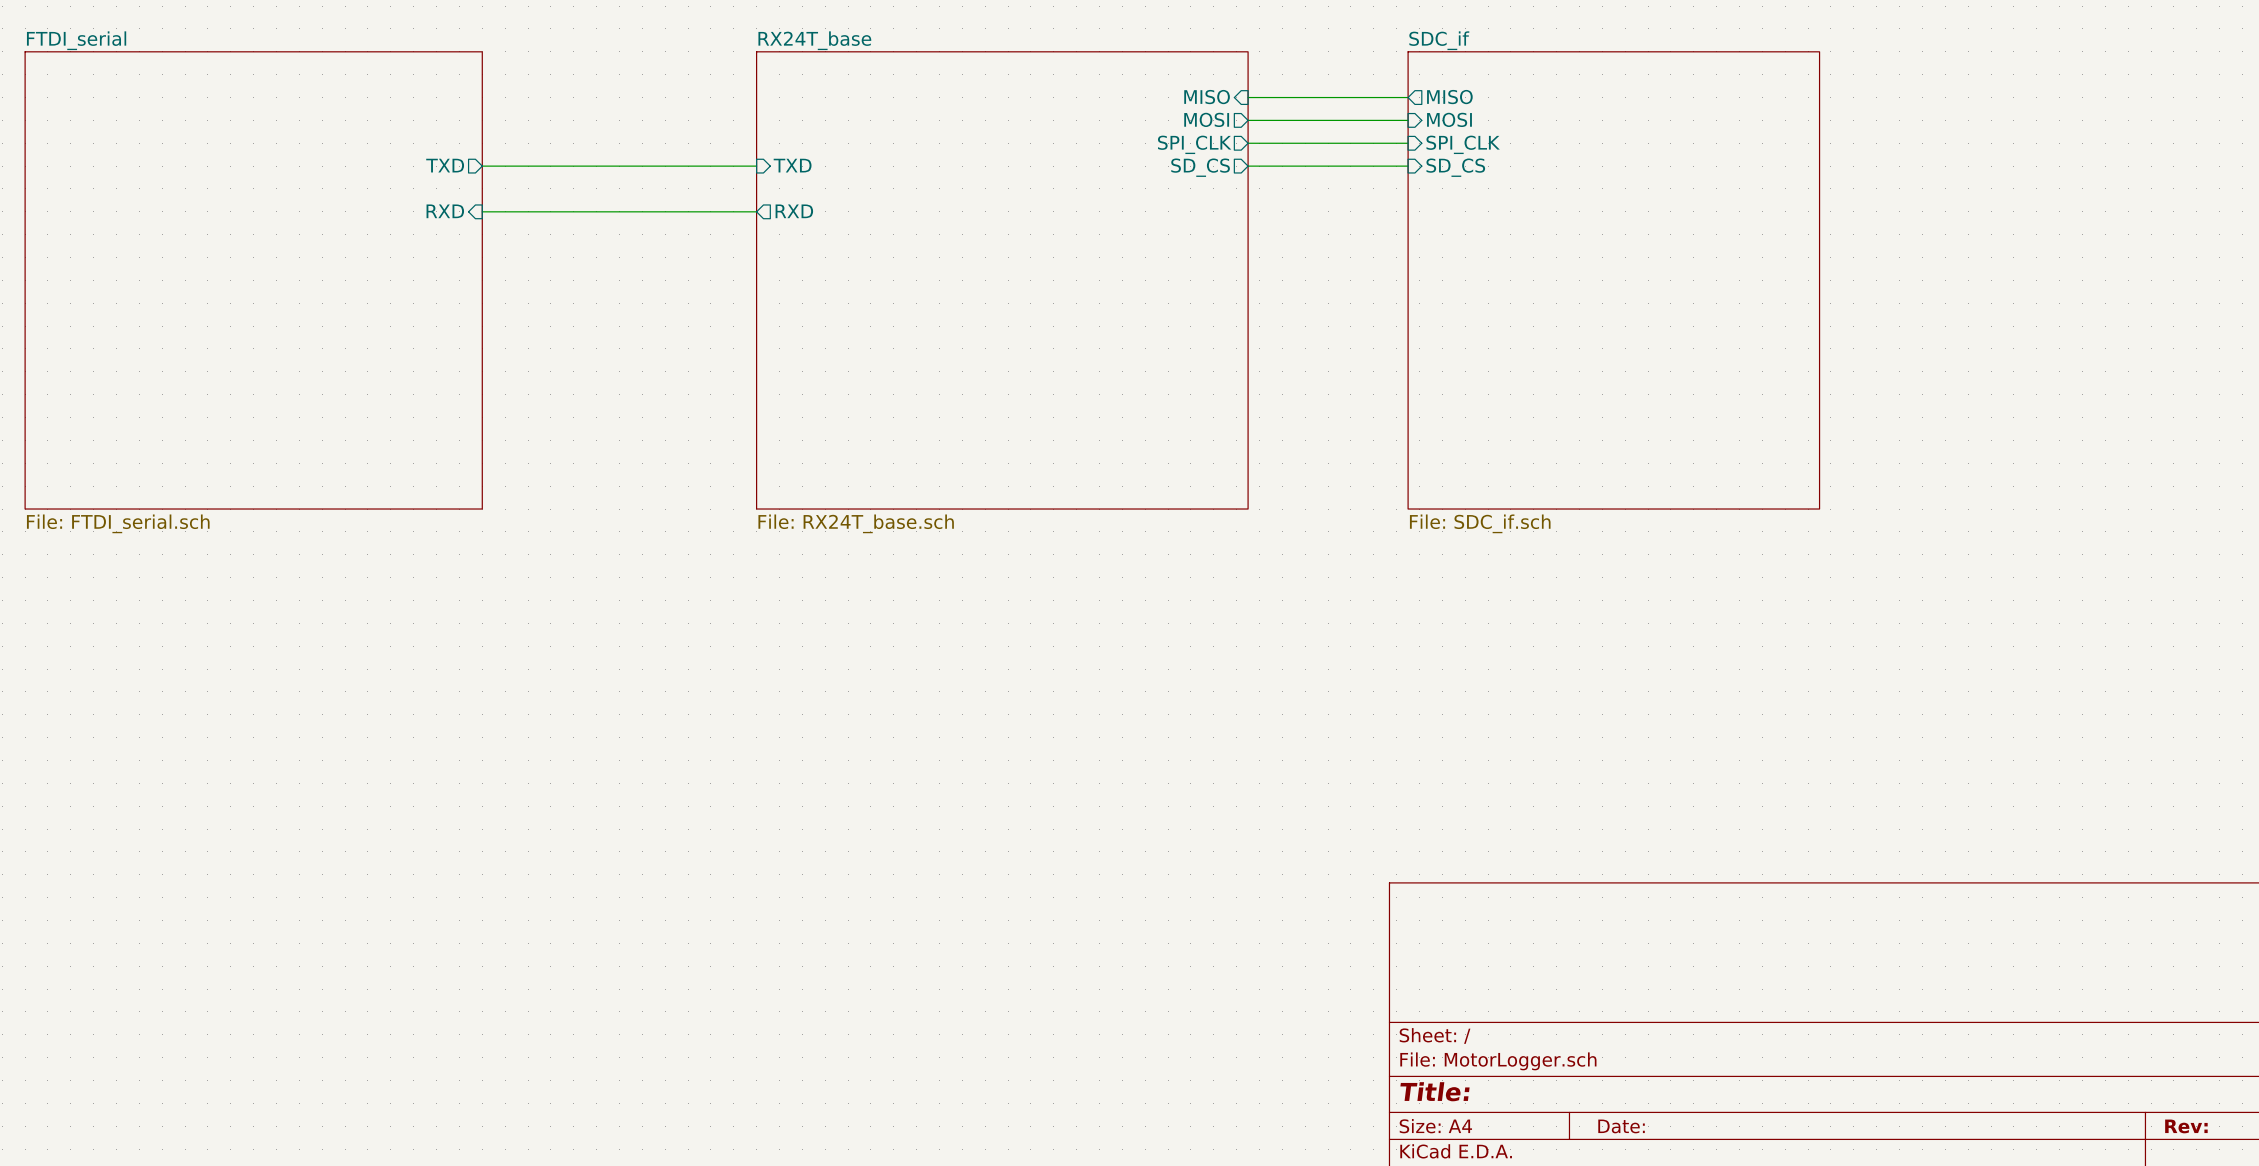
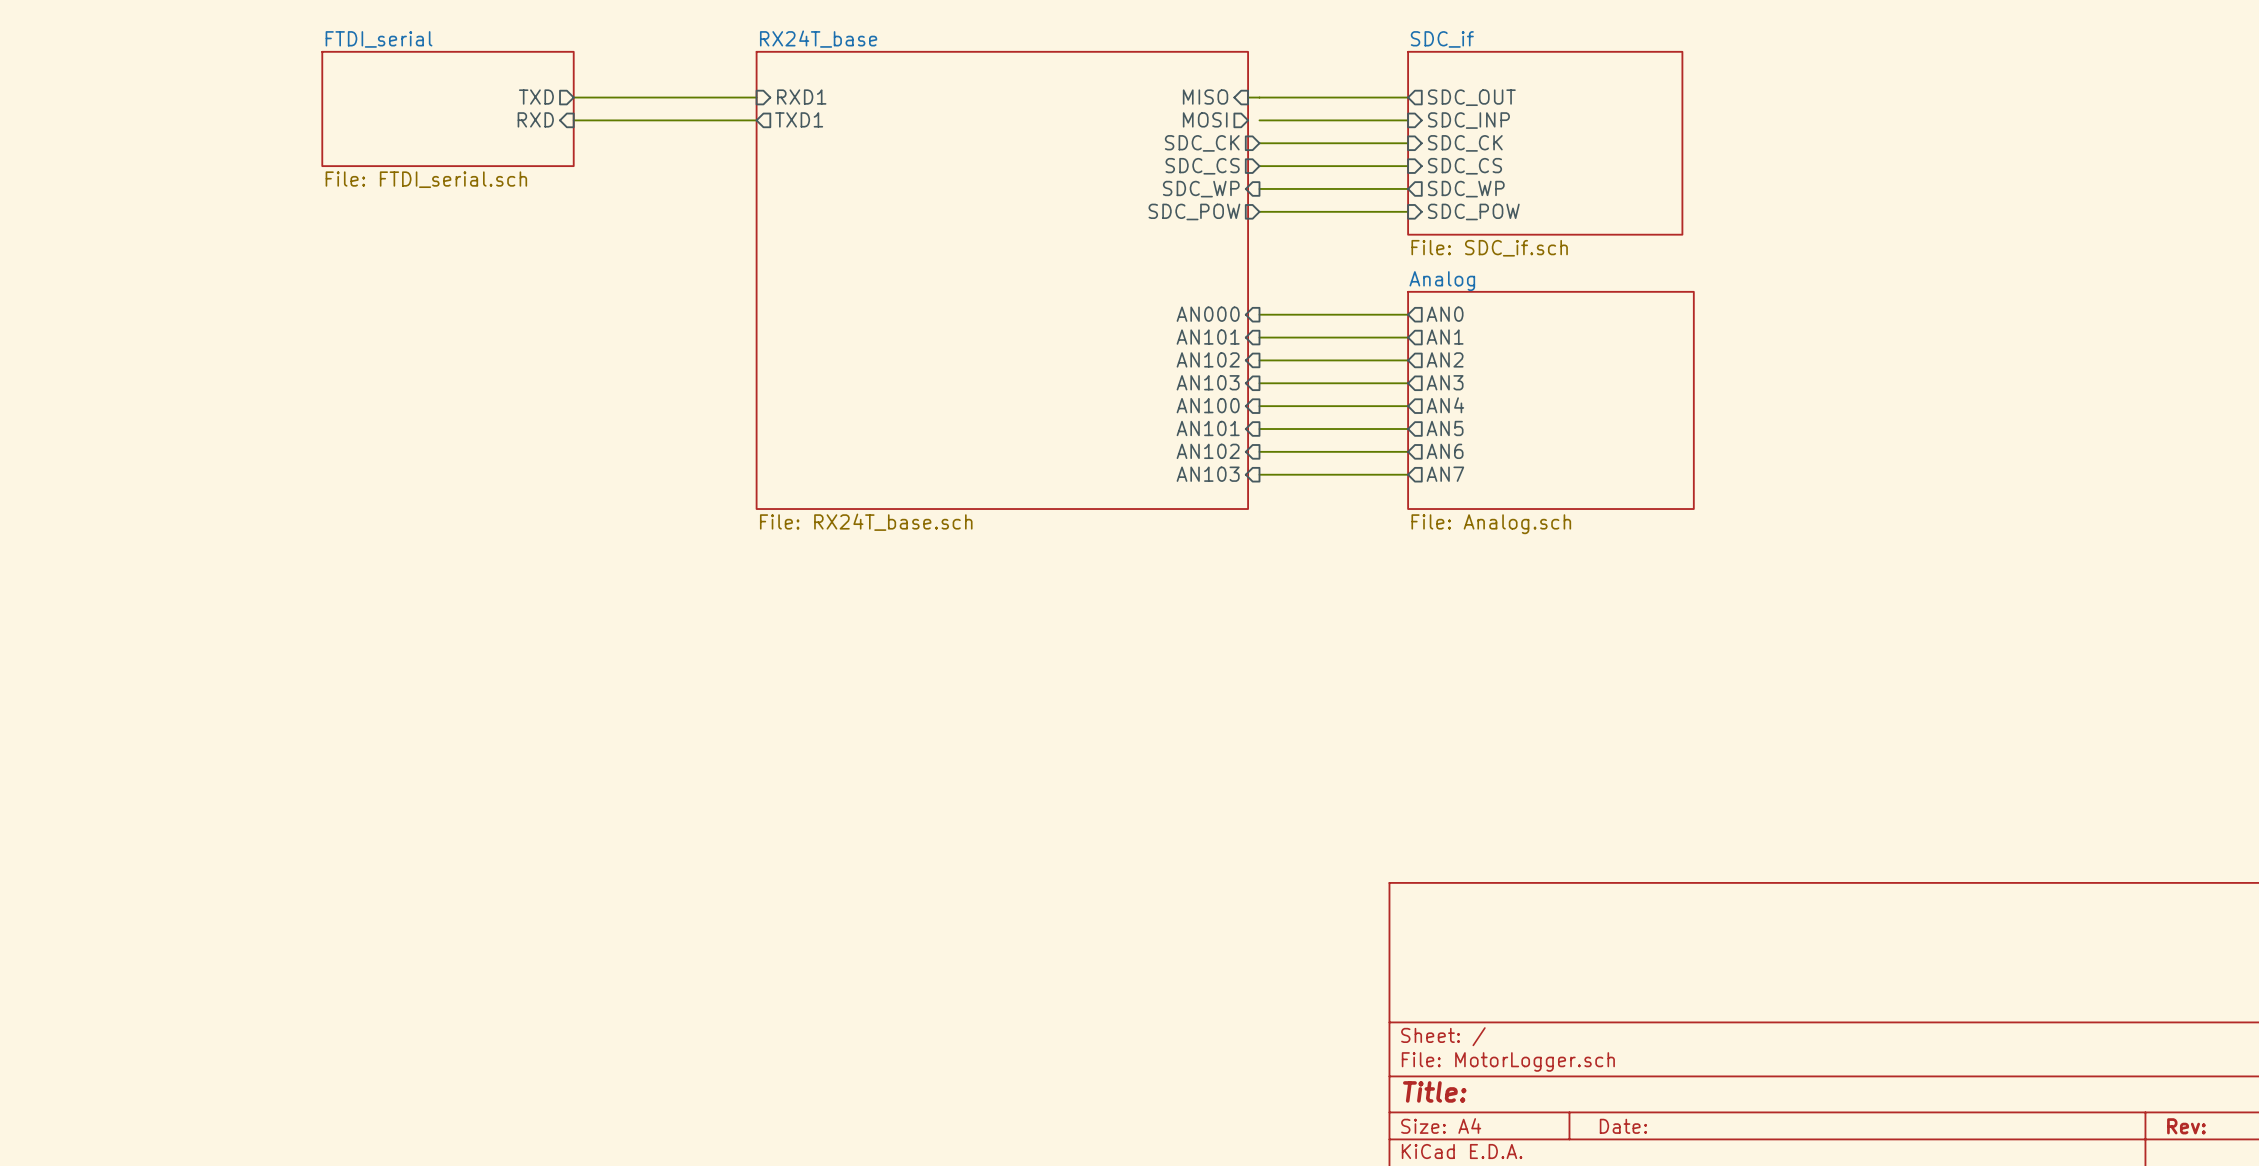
sheet pin: none -> TXD (536, 97)
wire: none -> (573, 97) (756, 97)
sheet pin: none -> RXD1 (801, 97)
sheet pin: MISO (1449, 97) -> SDC_OUT (1471, 97)
sheet FTDI_serial: none -> File: FTDI_serial.sch (448, 108)
sheet pin: none -> RXD (535, 119)
sheet pin: none -> TXD1 (799, 119)
sheet pin: MOSI (1449, 119) -> SDC_INP (1468, 120)
wire: none -> (573, 120) (756, 120)
wire: (1248, 120) (1259, 120) -> none
wire: (1248, 143) (1259, 143) -> none
sheet SDC_if: none -> File: SDC_if.sch (1545, 143)
sheet pin: SPI_CLK (1194, 144) -> SDC_CK (1202, 143)
sheet pin: SPI_CLK (1463, 144) -> SDC_CK (1465, 143)
sheet pin: TXD (445, 165) -> none
sheet pin: TXD (792, 165) -> none
wire: (482, 166) (756, 166) -> none
wire: (1248, 166) (1259, 166) -> none
sheet pin: SD_CS (1200, 167) -> SDC_CS (1202, 166)
sheet pin: SD_CS (1455, 167) -> SDC_CS (1464, 166)
wire: none -> (1259, 188) (1408, 188)
sheet pin: none -> SDC_WP (1201, 189)
sheet pin: none -> SDC_WP (1466, 189)
sheet pin: RXD (445, 211) -> none
wire: (482, 211) (756, 211) -> none
sheet pin: RXD (794, 211) -> none
wire: none -> (1259, 211) (1408, 211)
sheet pin: none -> SDC_POW (1194, 211)
sheet pin: none -> SDC_POW (1473, 211)
sheet FTDI_serial: File: FTDI_serial.sch (253, 280) -> none
sheet SDC_if: File: SDC_if.sch (1613, 280) -> none
sheet pin: none -> AN000 (1208, 314)
wire: none -> (1259, 314) (1408, 314)
sheet pin: none -> AN0 (1445, 314)
sheet pin: none -> AN101 (1208, 337)
wire: none -> (1259, 337) (1408, 337)
sheet pin: none -> AN1 (1445, 337)
sheet pin: none -> AN102 (1208, 359)
sheet pin: none -> AN2 (1445, 359)
wire: none -> (1259, 360) (1408, 360)
sheet pin: none -> AN103 (1208, 382)
sheet pin: none -> AN3 (1445, 382)
wire: none -> (1259, 383) (1408, 383)
sheet Analog: none -> File: Analog.sch (1550, 400)
sheet pin: none -> AN100 (1208, 405)
sheet pin: none -> AN4 (1445, 405)
wire: none -> (1259, 406) (1408, 406)
sheet pin: none -> AN101 (1208, 428)
sheet pin: none -> AN5 (1445, 428)
wire: none -> (1259, 429) (1408, 429)
sheet pin: none -> AN102 (1208, 451)
wire: none -> (1259, 451) (1408, 451)
sheet pin: none -> AN6 (1445, 451)
sheet pin: none -> AN103 (1208, 474)
wire: none -> (1259, 474) (1408, 474)
sheet pin: none -> AN7 (1445, 474)

